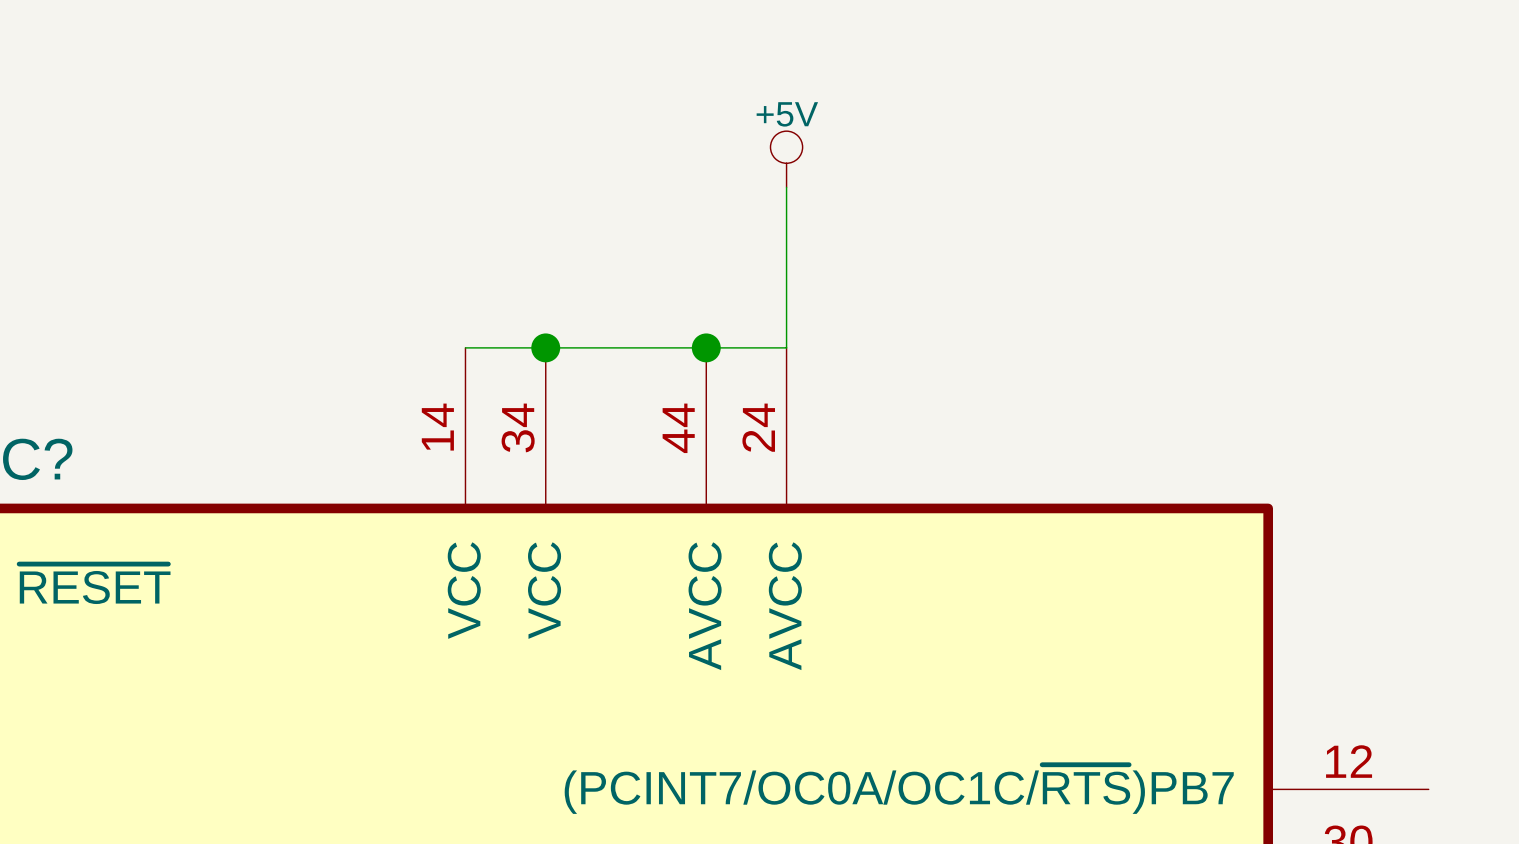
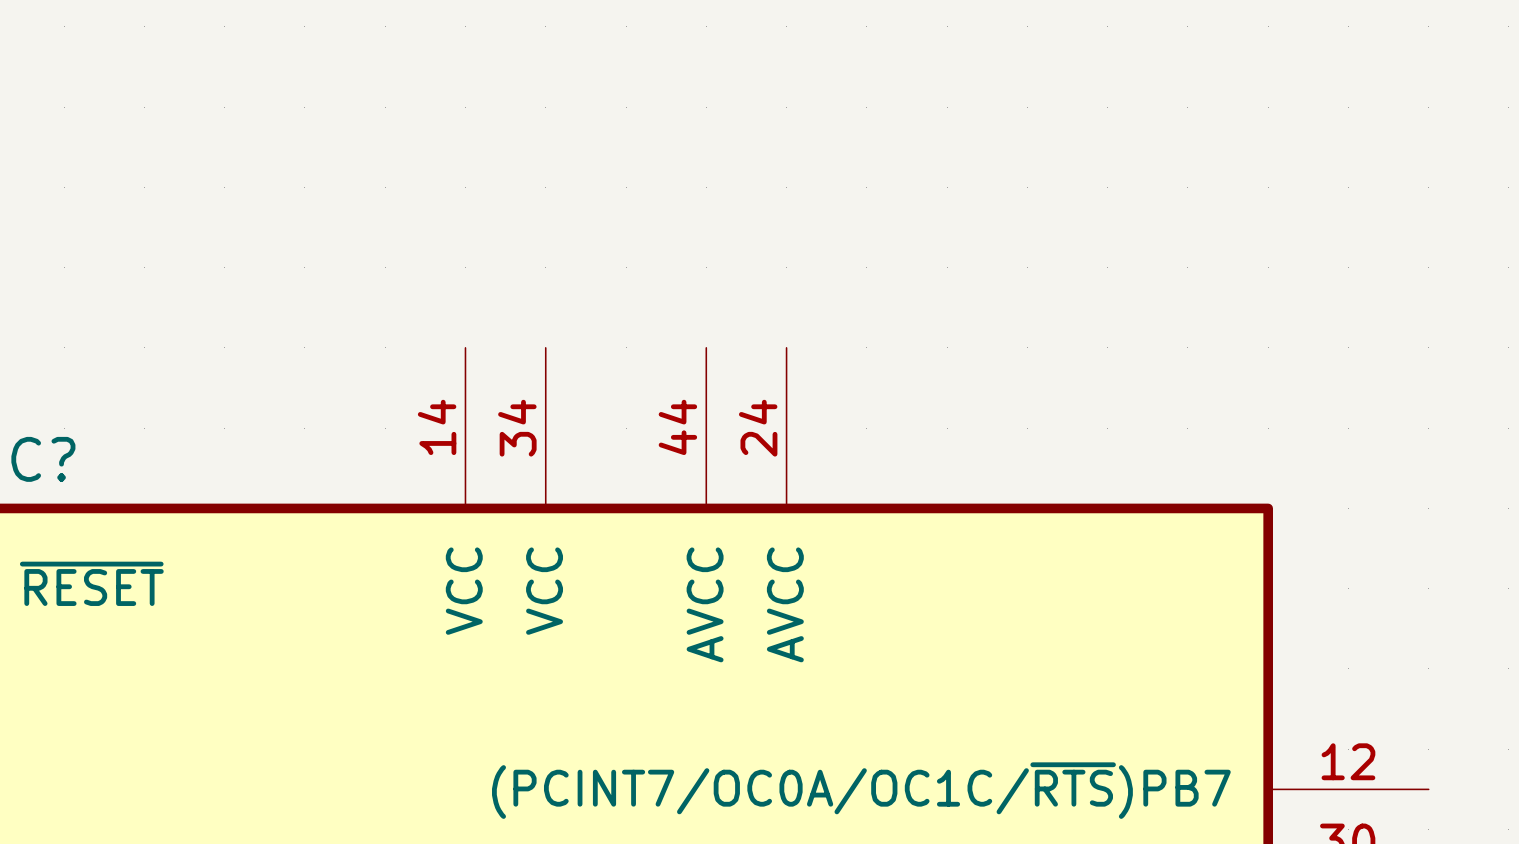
power symbol: +5V (786, 159) -> none
wire: (786, 187) (786, 347) (465, 347) -> none
junction: (545, 347) -> none
junction: (706, 347) -> none

